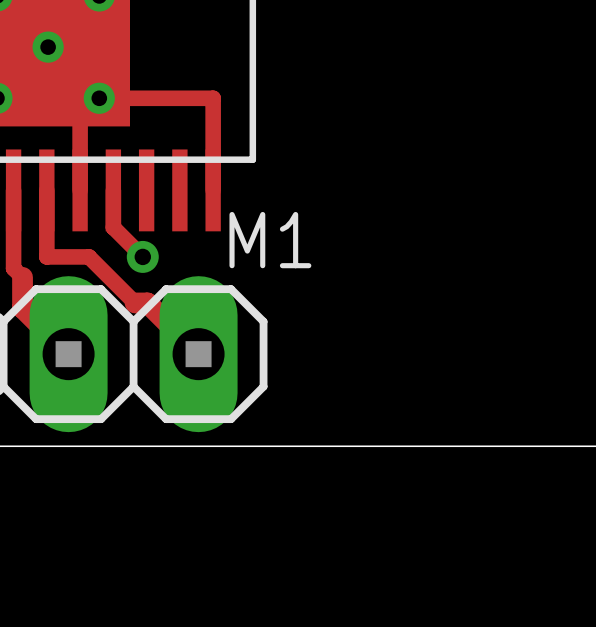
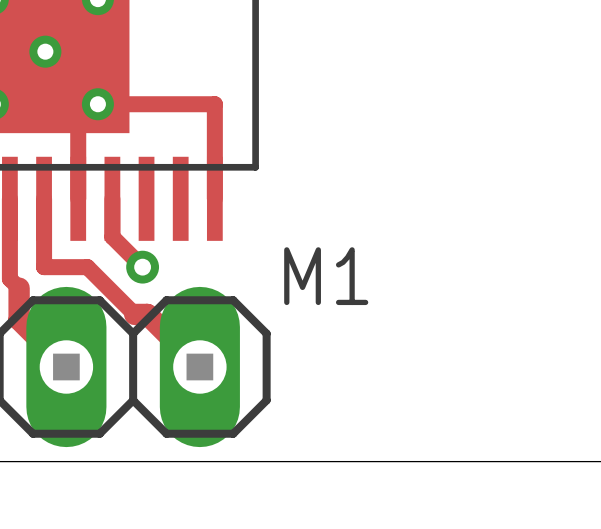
M1 name position: M1 (270, 240) -> M1 (326, 276)

